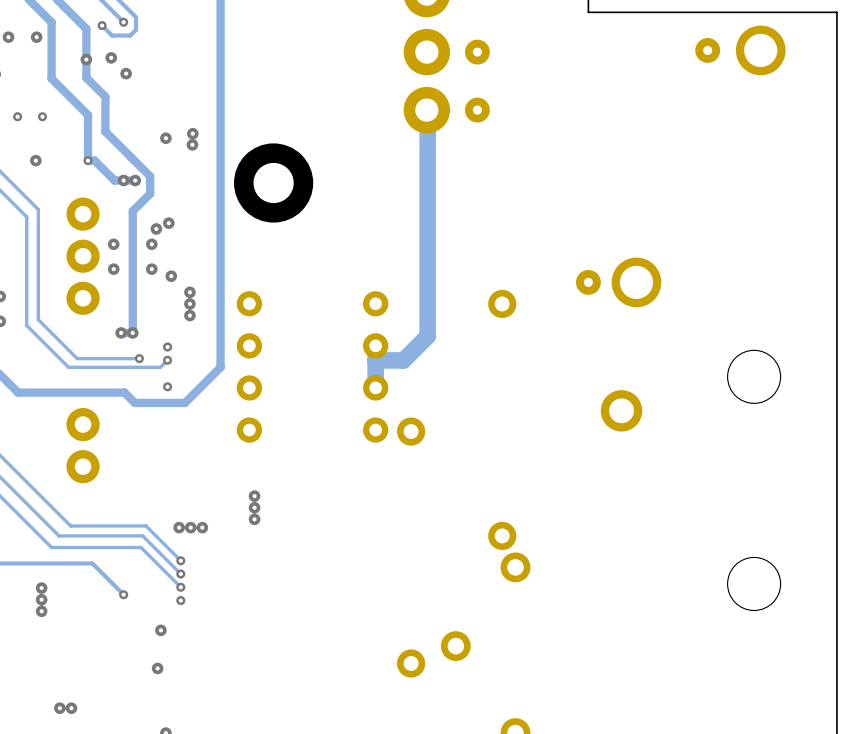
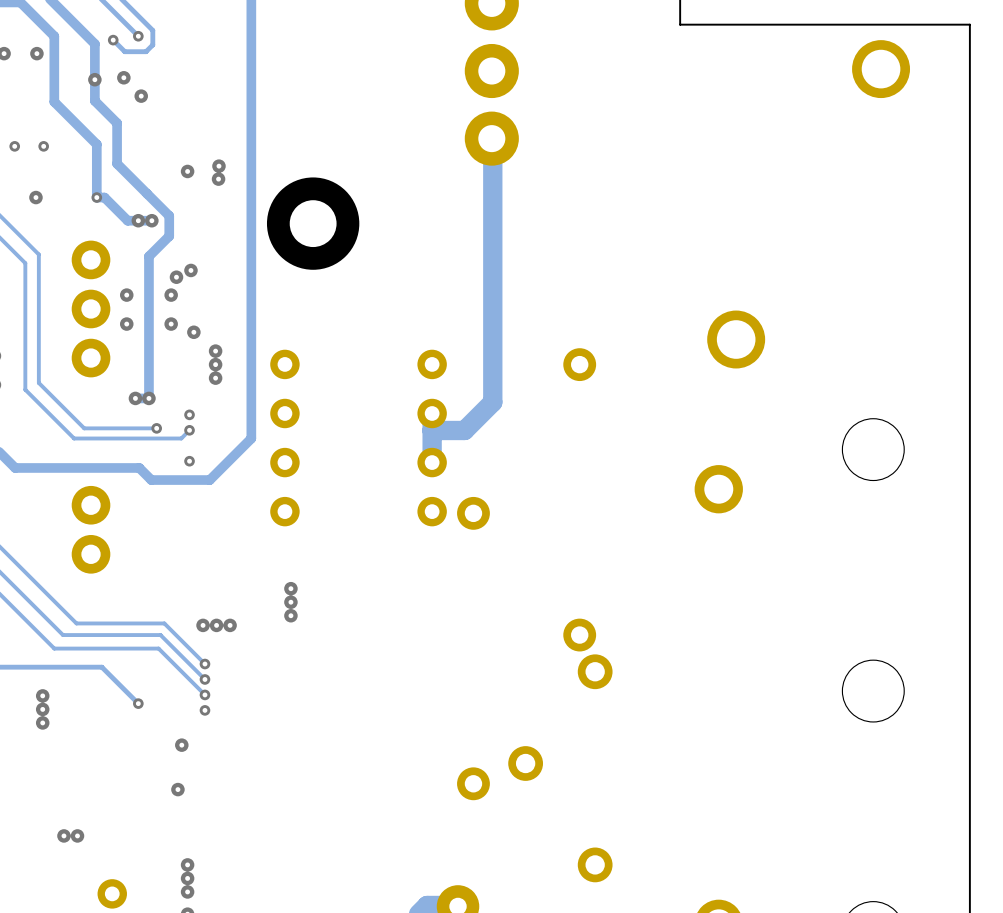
part: (707, 50) -> none
part: (477, 52) -> none
part: (477, 110) -> none
part: (588, 282) -> none

